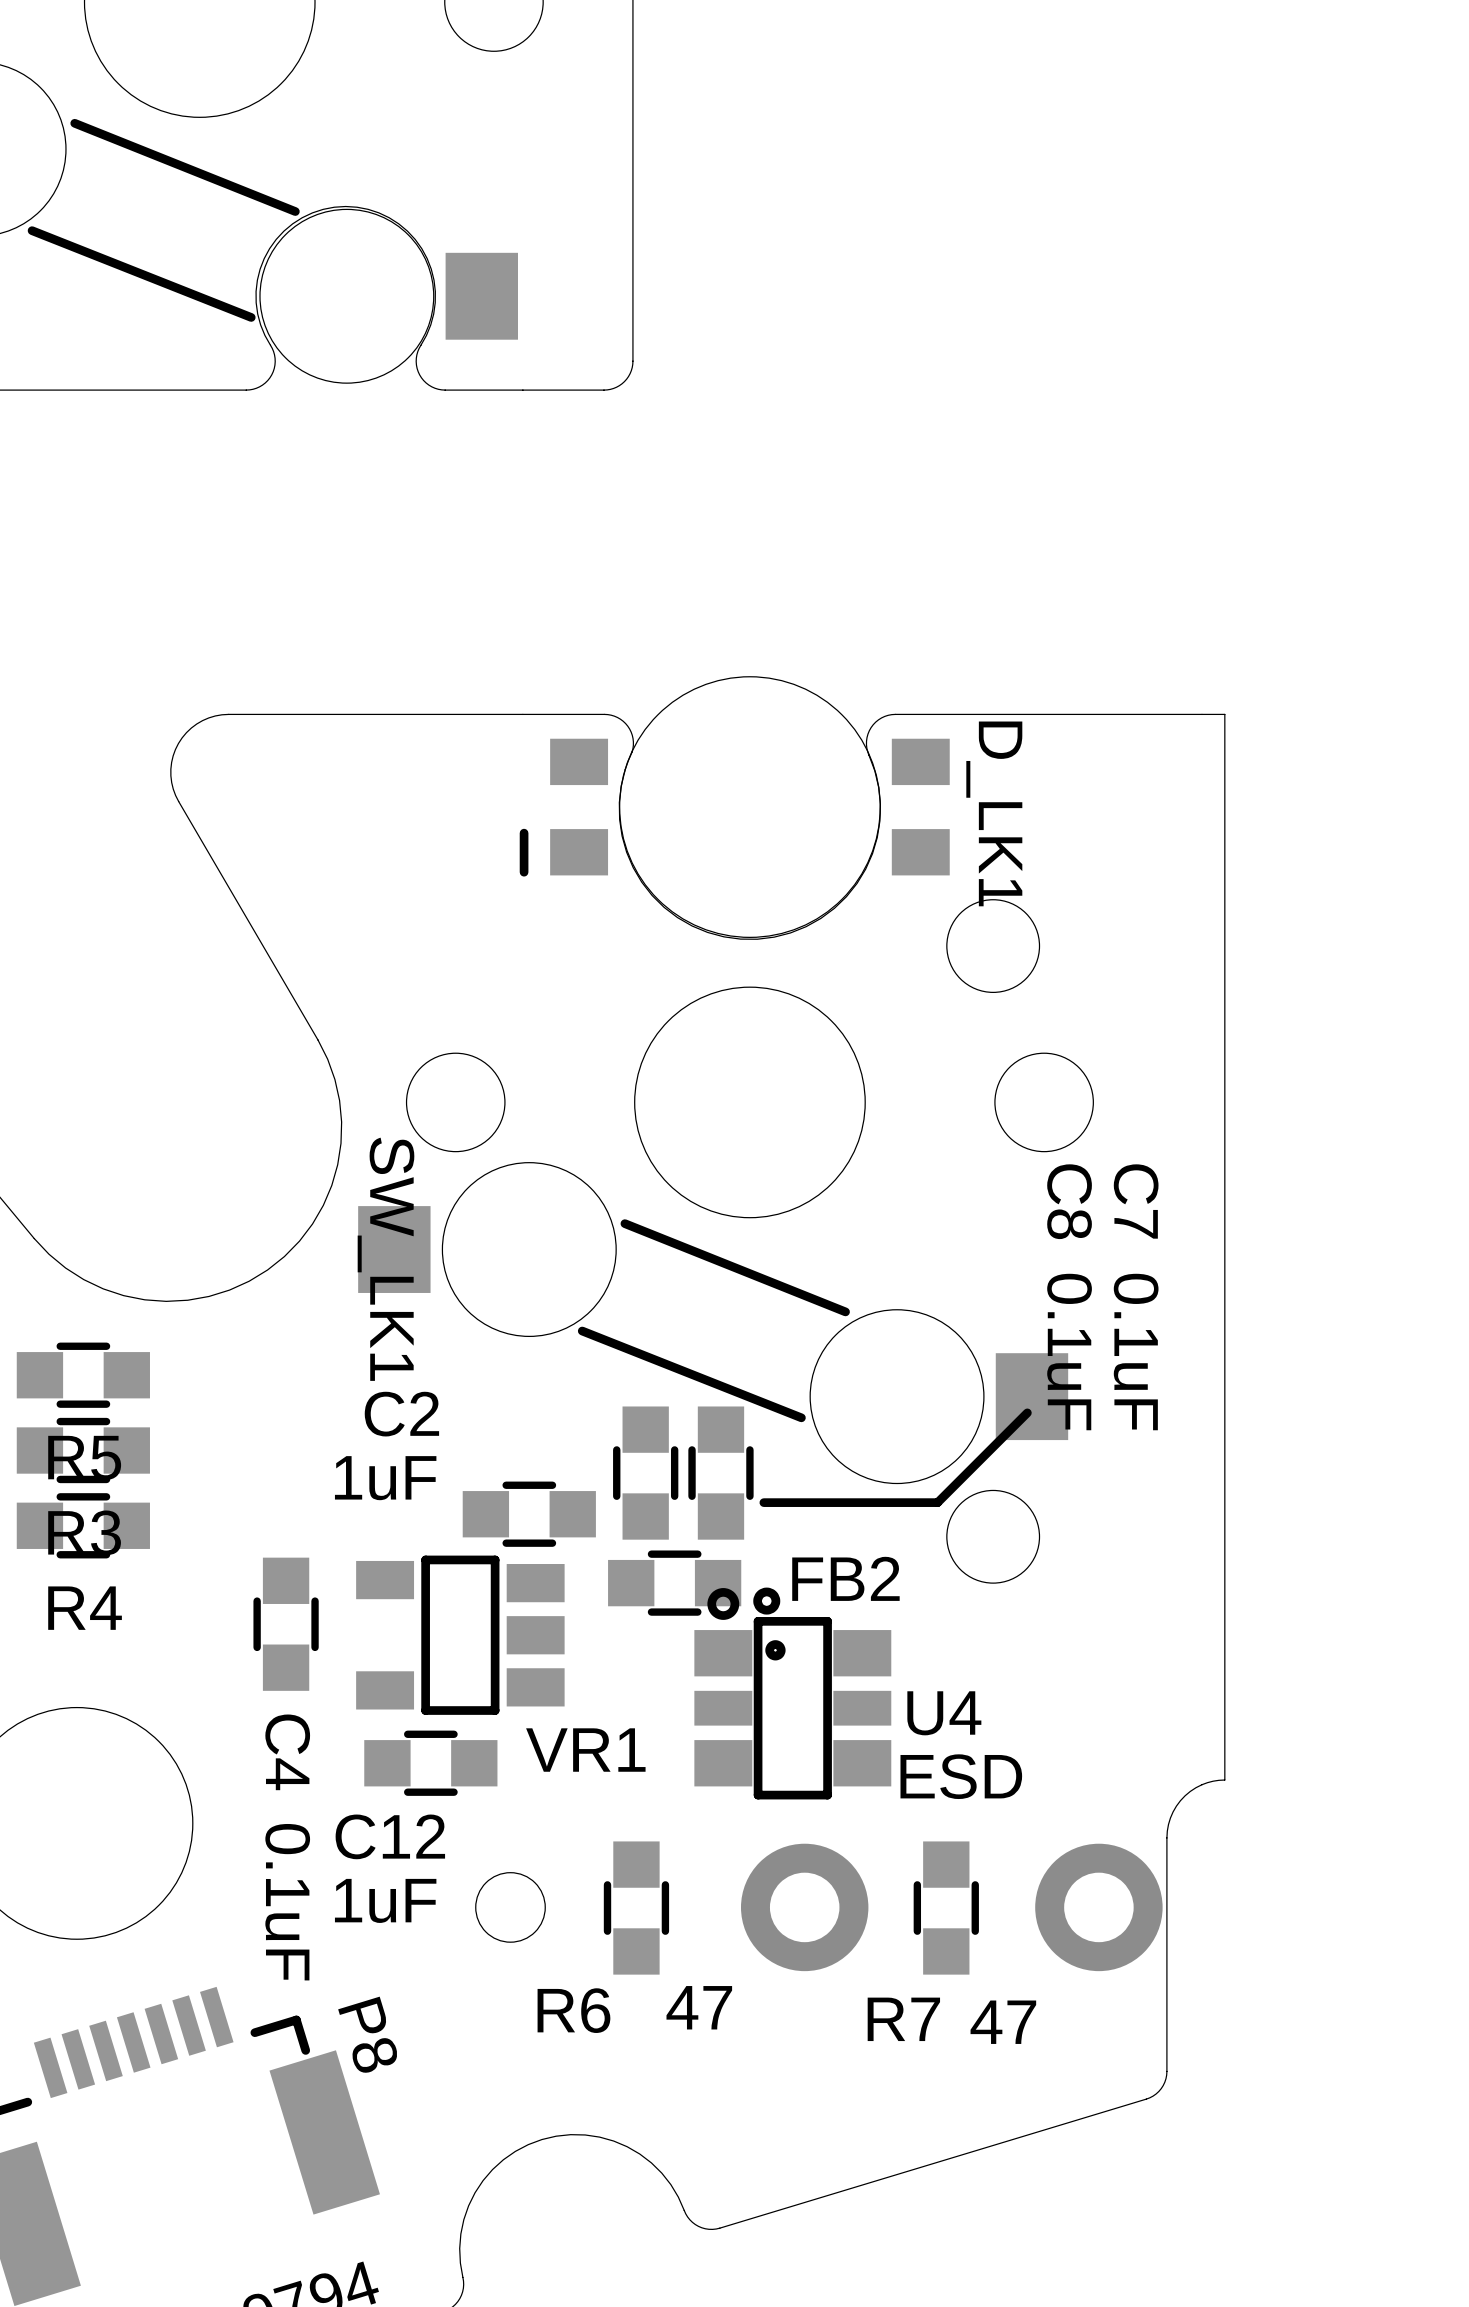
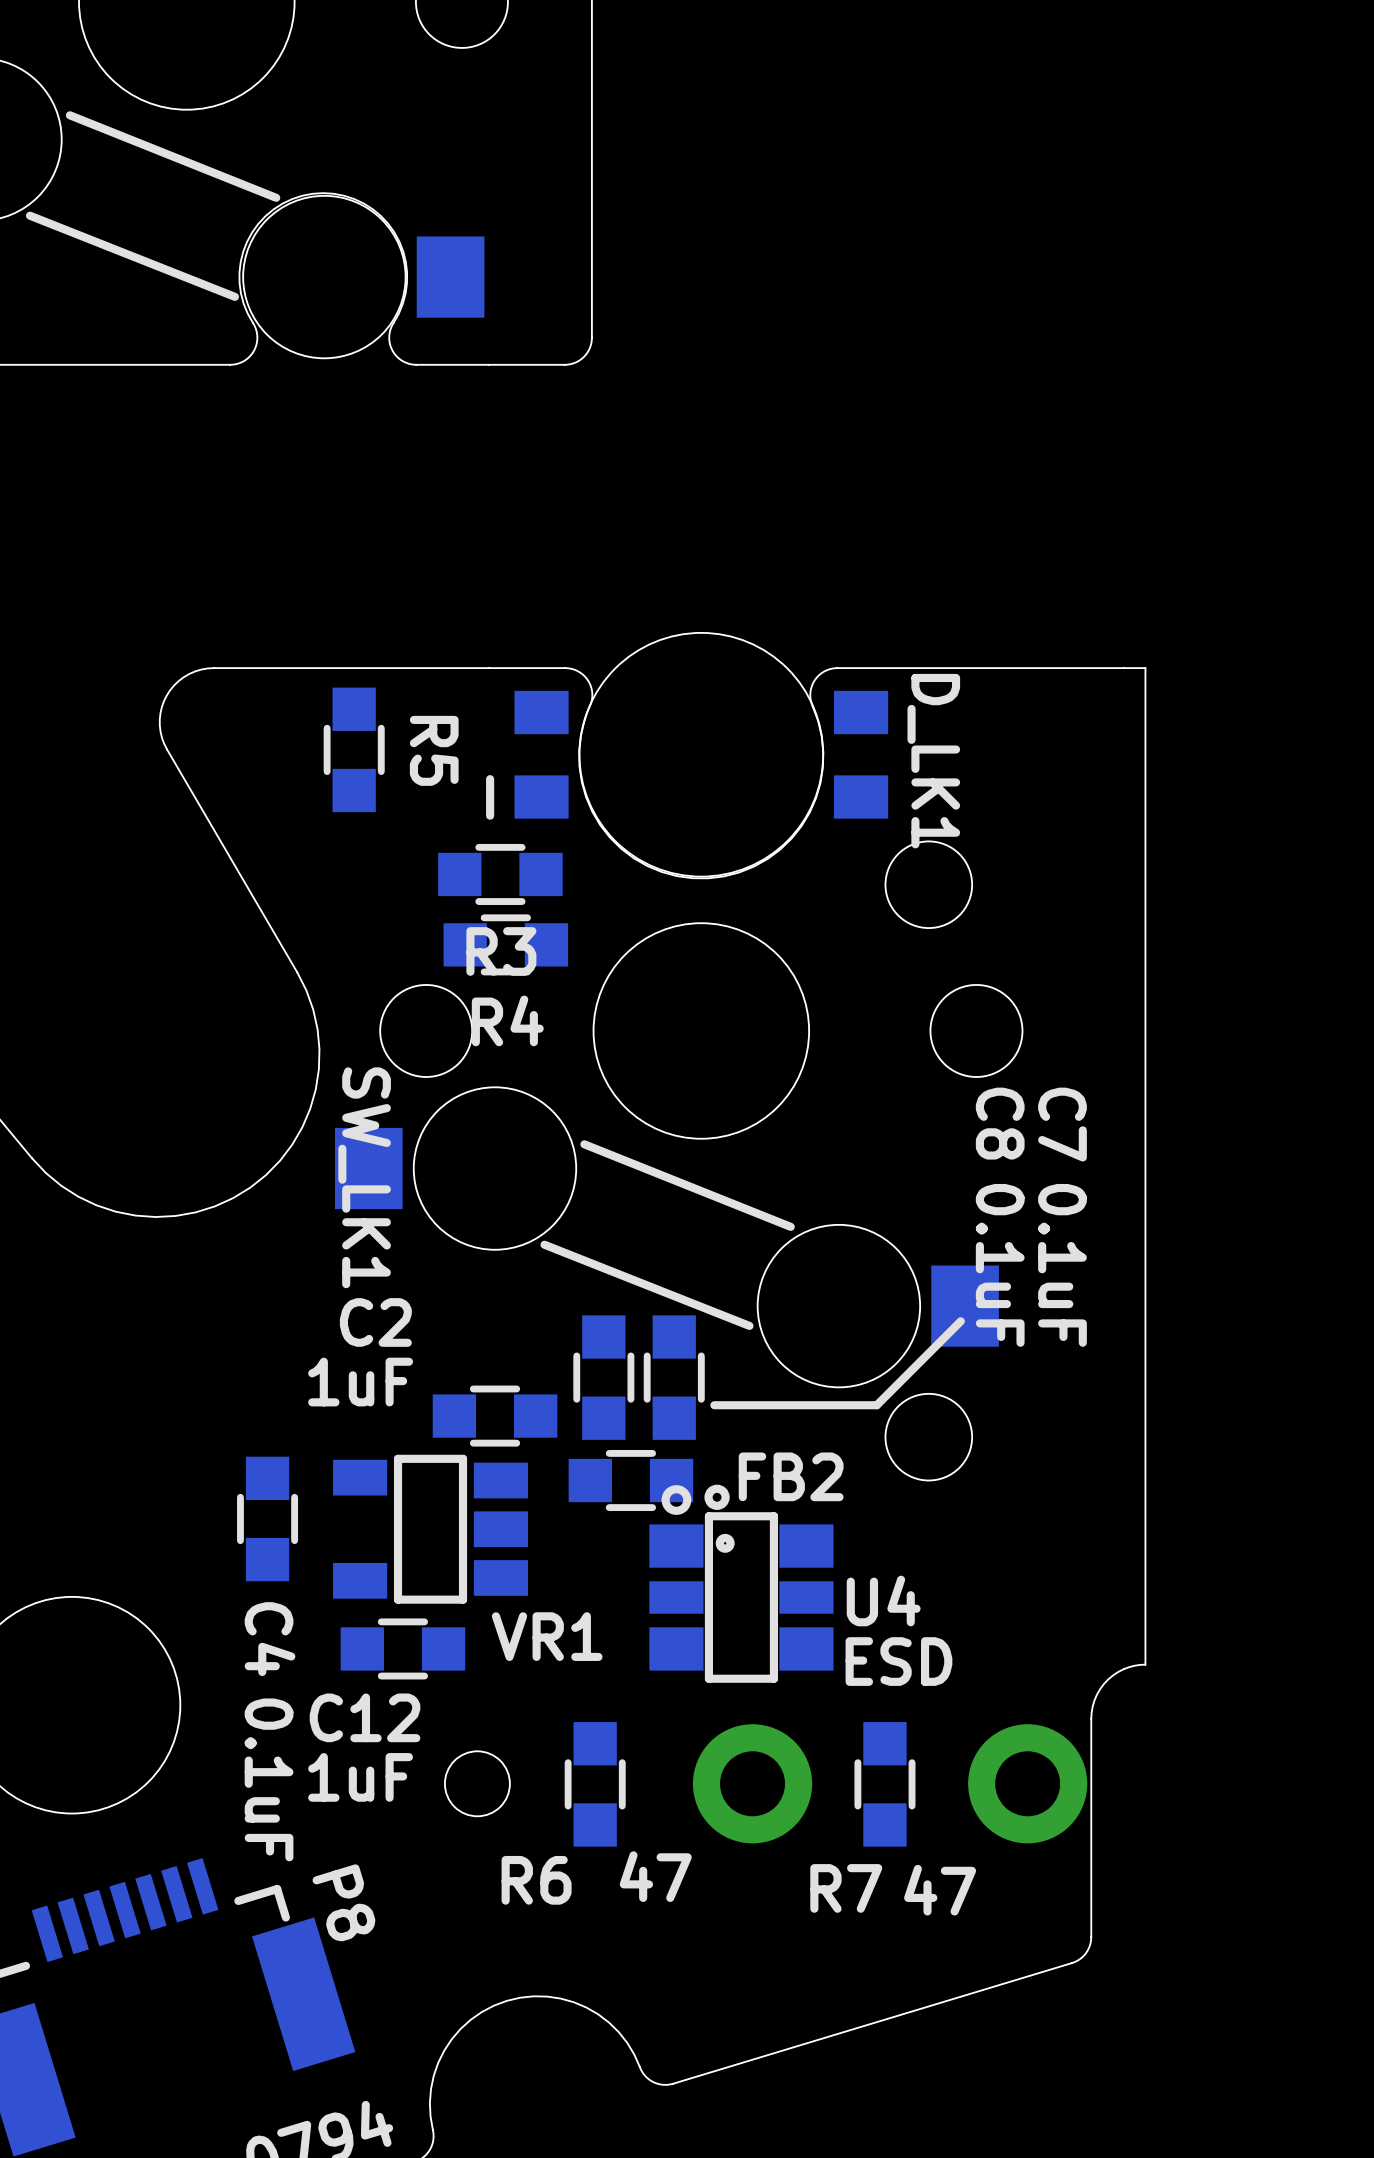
R5 rotation: 0° (83, 1375) -> 90° clockwise (354, 749)
R5 position: (83, 1375) -> (354, 749)
R3 position: (83, 1450) -> (500, 874)
R5 name position: R5 (84, 1457) -> R5 (434, 750)
R4 position: (83, 1525) -> (505, 944)

